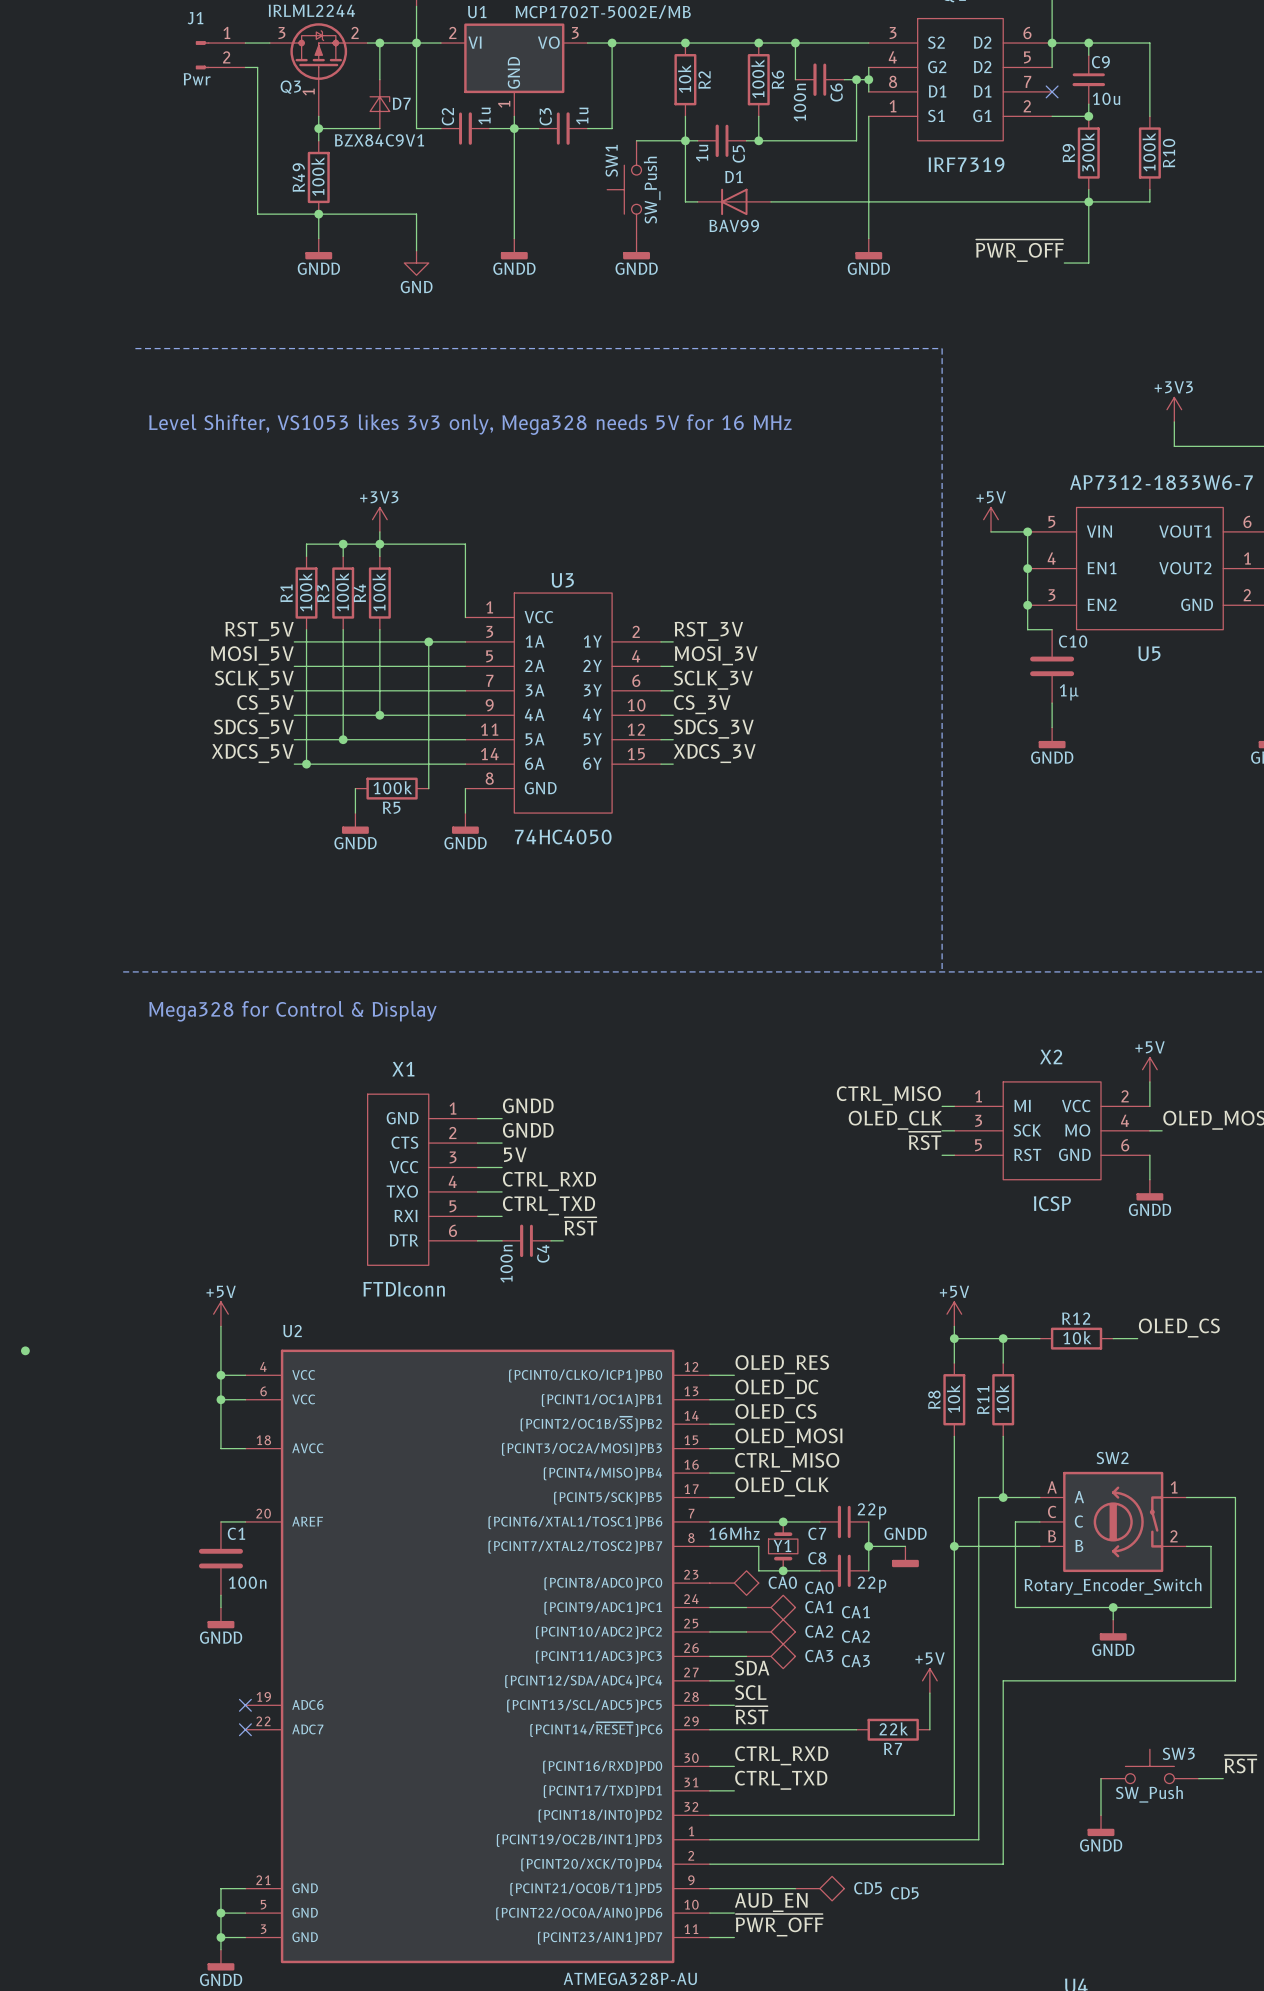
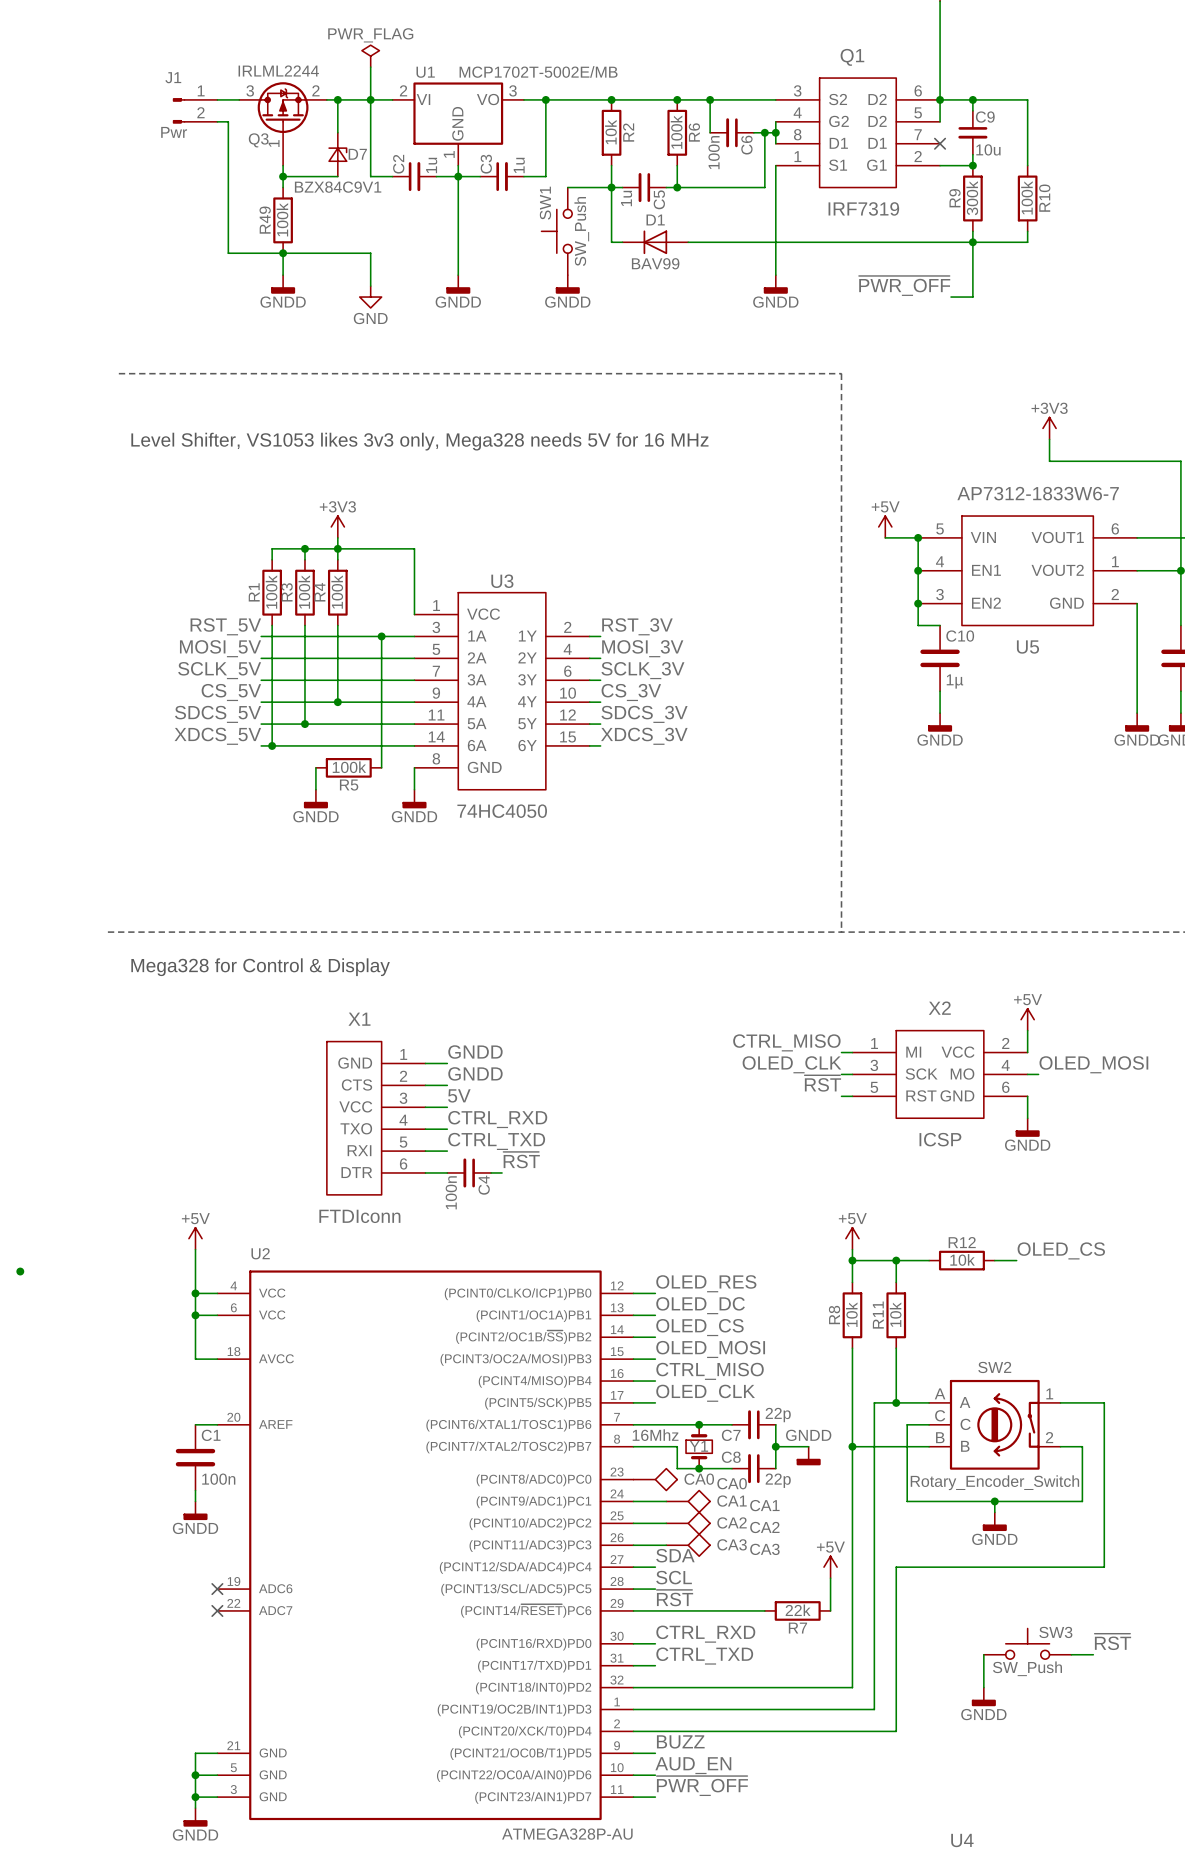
label: none -> BUZZ (680, 1741)
wire: (734, 1888) (795, 1888) -> none
CD5: CD5 (819, 1888) -> none

